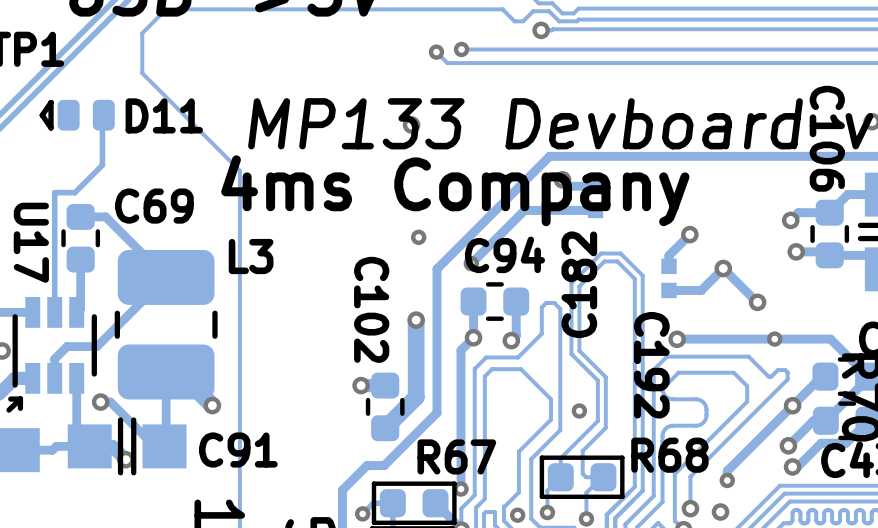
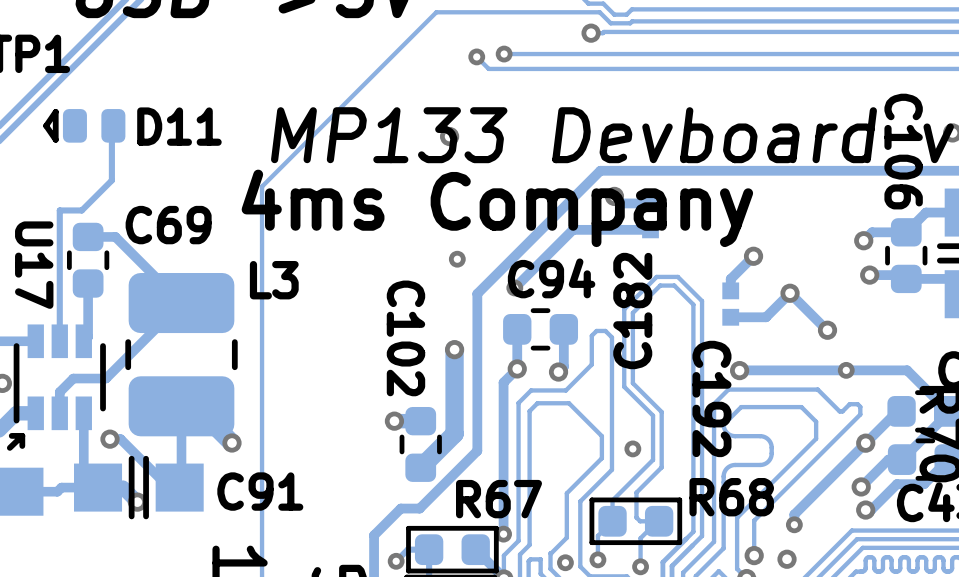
track: (533, 11) (523, 21) (514, 21) (502, 9) (166, 9) (142, 33) (142, 73) (239, 170) -> (582, 12) (436, 12) (262, 186)

